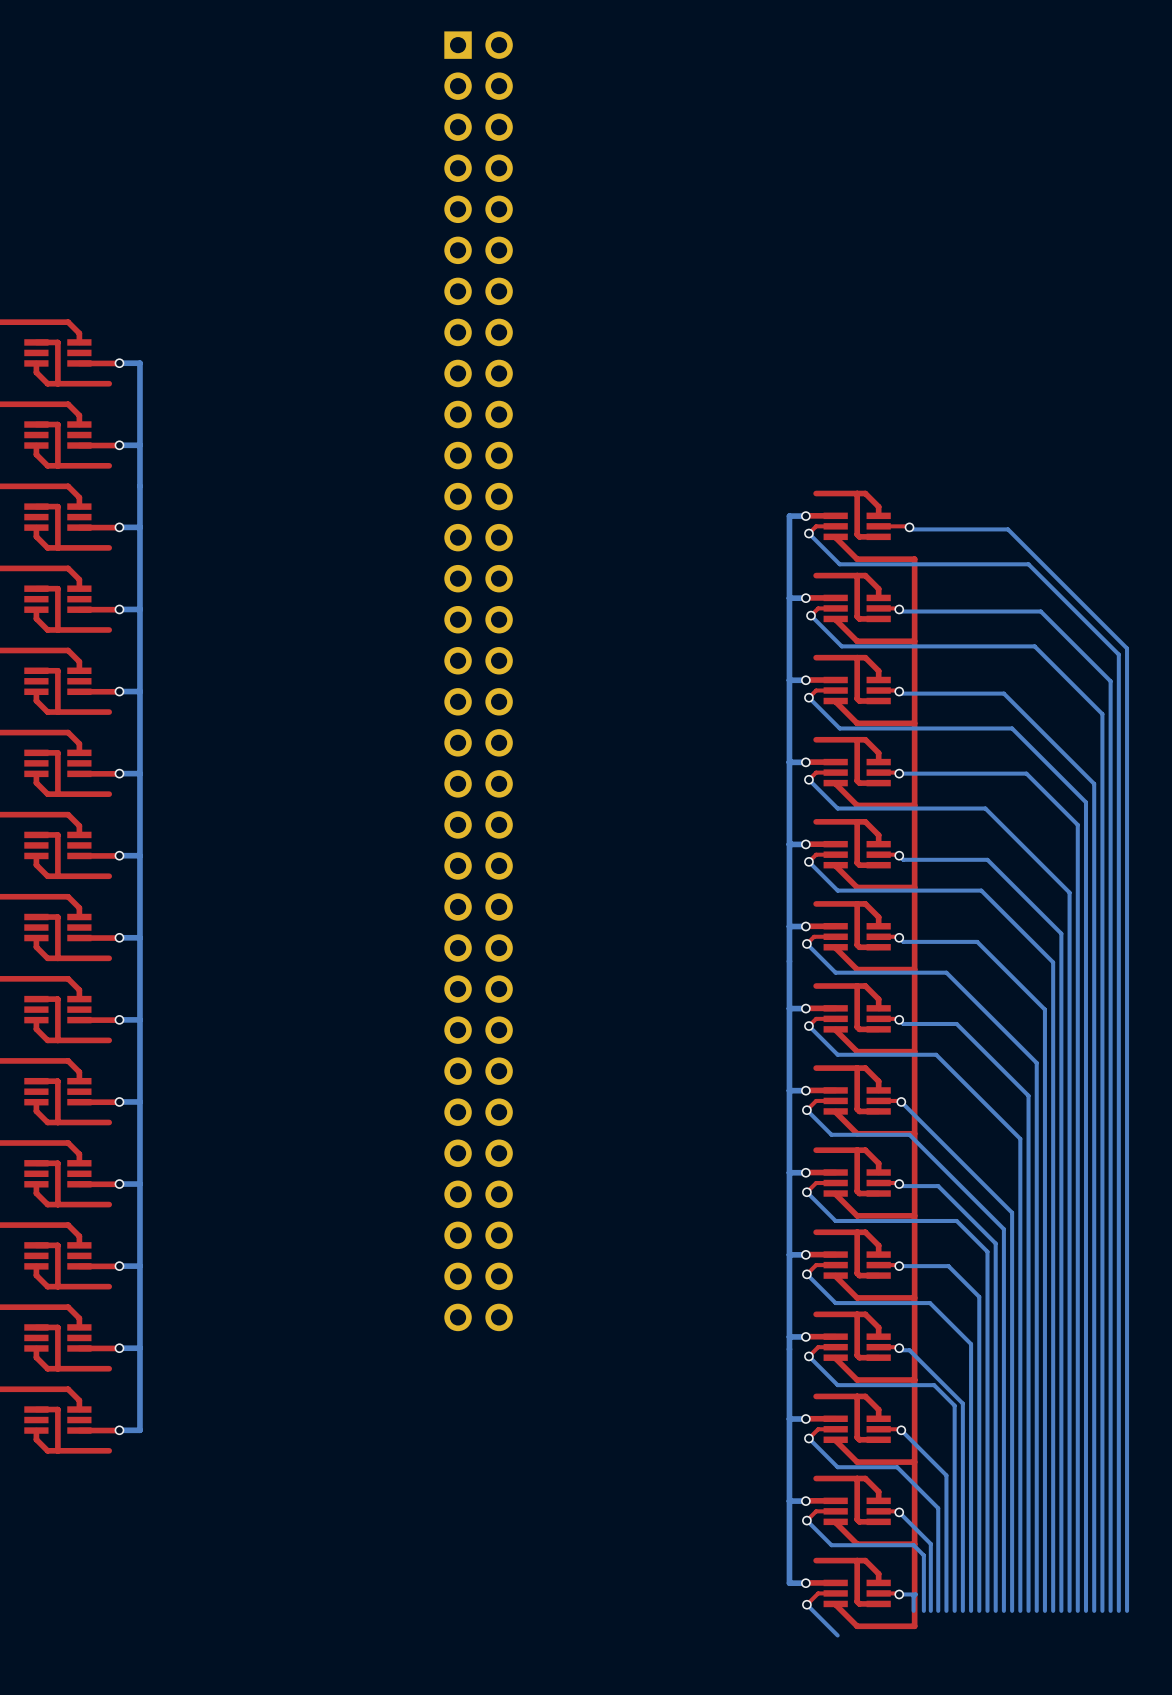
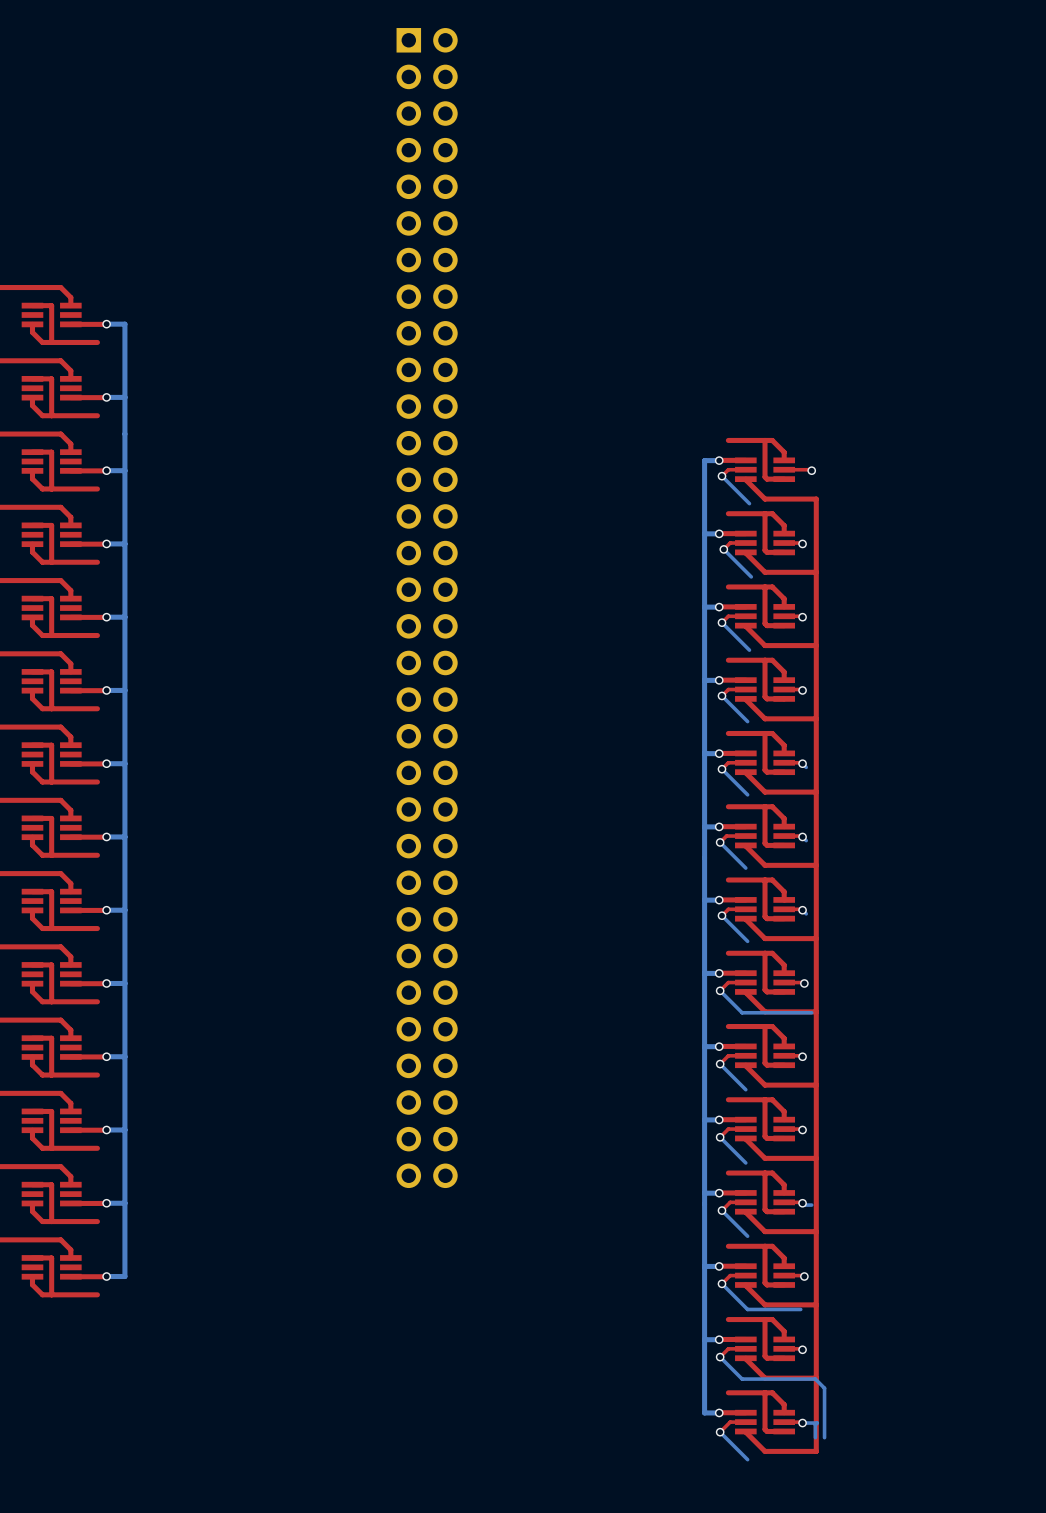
bottom track: (911, 529) (1008, 529) (1127, 648) (1127, 1610) -> none
bottom track: (839, 564) (1028, 564) (1118, 654) (1118, 1610) -> none
bottom track: (901, 611) (1040, 611) (1110, 681) (1110, 1610) -> none
bottom track: (841, 646) (1034, 646) (1102, 714) (1102, 1610) -> none
bottom track: (901, 693) (1003, 693) (1094, 783) (1094, 1610) -> none
bottom track: (839, 728) (1012, 728) (1085, 802) (1085, 1610) -> none
bottom track: (899, 773) (1026, 773) (1077, 824) (1077, 1610) -> none
bottom track: (837, 808) (985, 808) (1069, 892) (1069, 1610) -> none
bottom track: (903, 859) (987, 859) (1061, 933) (1061, 1610) -> none
bottom track: (837, 890) (981, 890) (1053, 962) (1053, 1610) -> none
bottom track: (903, 941) (977, 941) (1044, 1009) (1044, 1610) -> none
bottom track: (835, 972) (946, 972) (1036, 1062) (1036, 1610) -> none
bottom track: (903, 1023) (956, 1023) (1028, 1095) (1028, 1610) -> none
bottom track: (837, 1054) (936, 1054) (1020, 1138) (1020, 1610) -> none
bottom track: (901, 1101) (1012, 1212) (1012, 1610) -> none
bottom track: (909, 1134) (1003, 1229) (1003, 1610) -> none
bottom track: (901, 1186) (938, 1186) (995, 1243) (995, 1610) -> none
bottom track: (835, 1220) (956, 1220) (987, 1251) (987, 1610) -> none
bottom track: (899, 1266) (948, 1266) (979, 1296) (979, 1610) -> none
bottom track: (835, 1303) (930, 1303) (971, 1344) (971, 1610) -> none
bottom track: (909, 1350) (962, 1403) (962, 1610) -> none
bottom track: (837, 1385) (934, 1385) (954, 1405) (954, 1610) -> none
bottom track: (901, 1430) (946, 1475) (946, 1610) -> none
bottom track: (897, 1467) (938, 1508) (938, 1610) -> none
bottom track: (899, 1512) (930, 1543) (930, 1610) -> none

